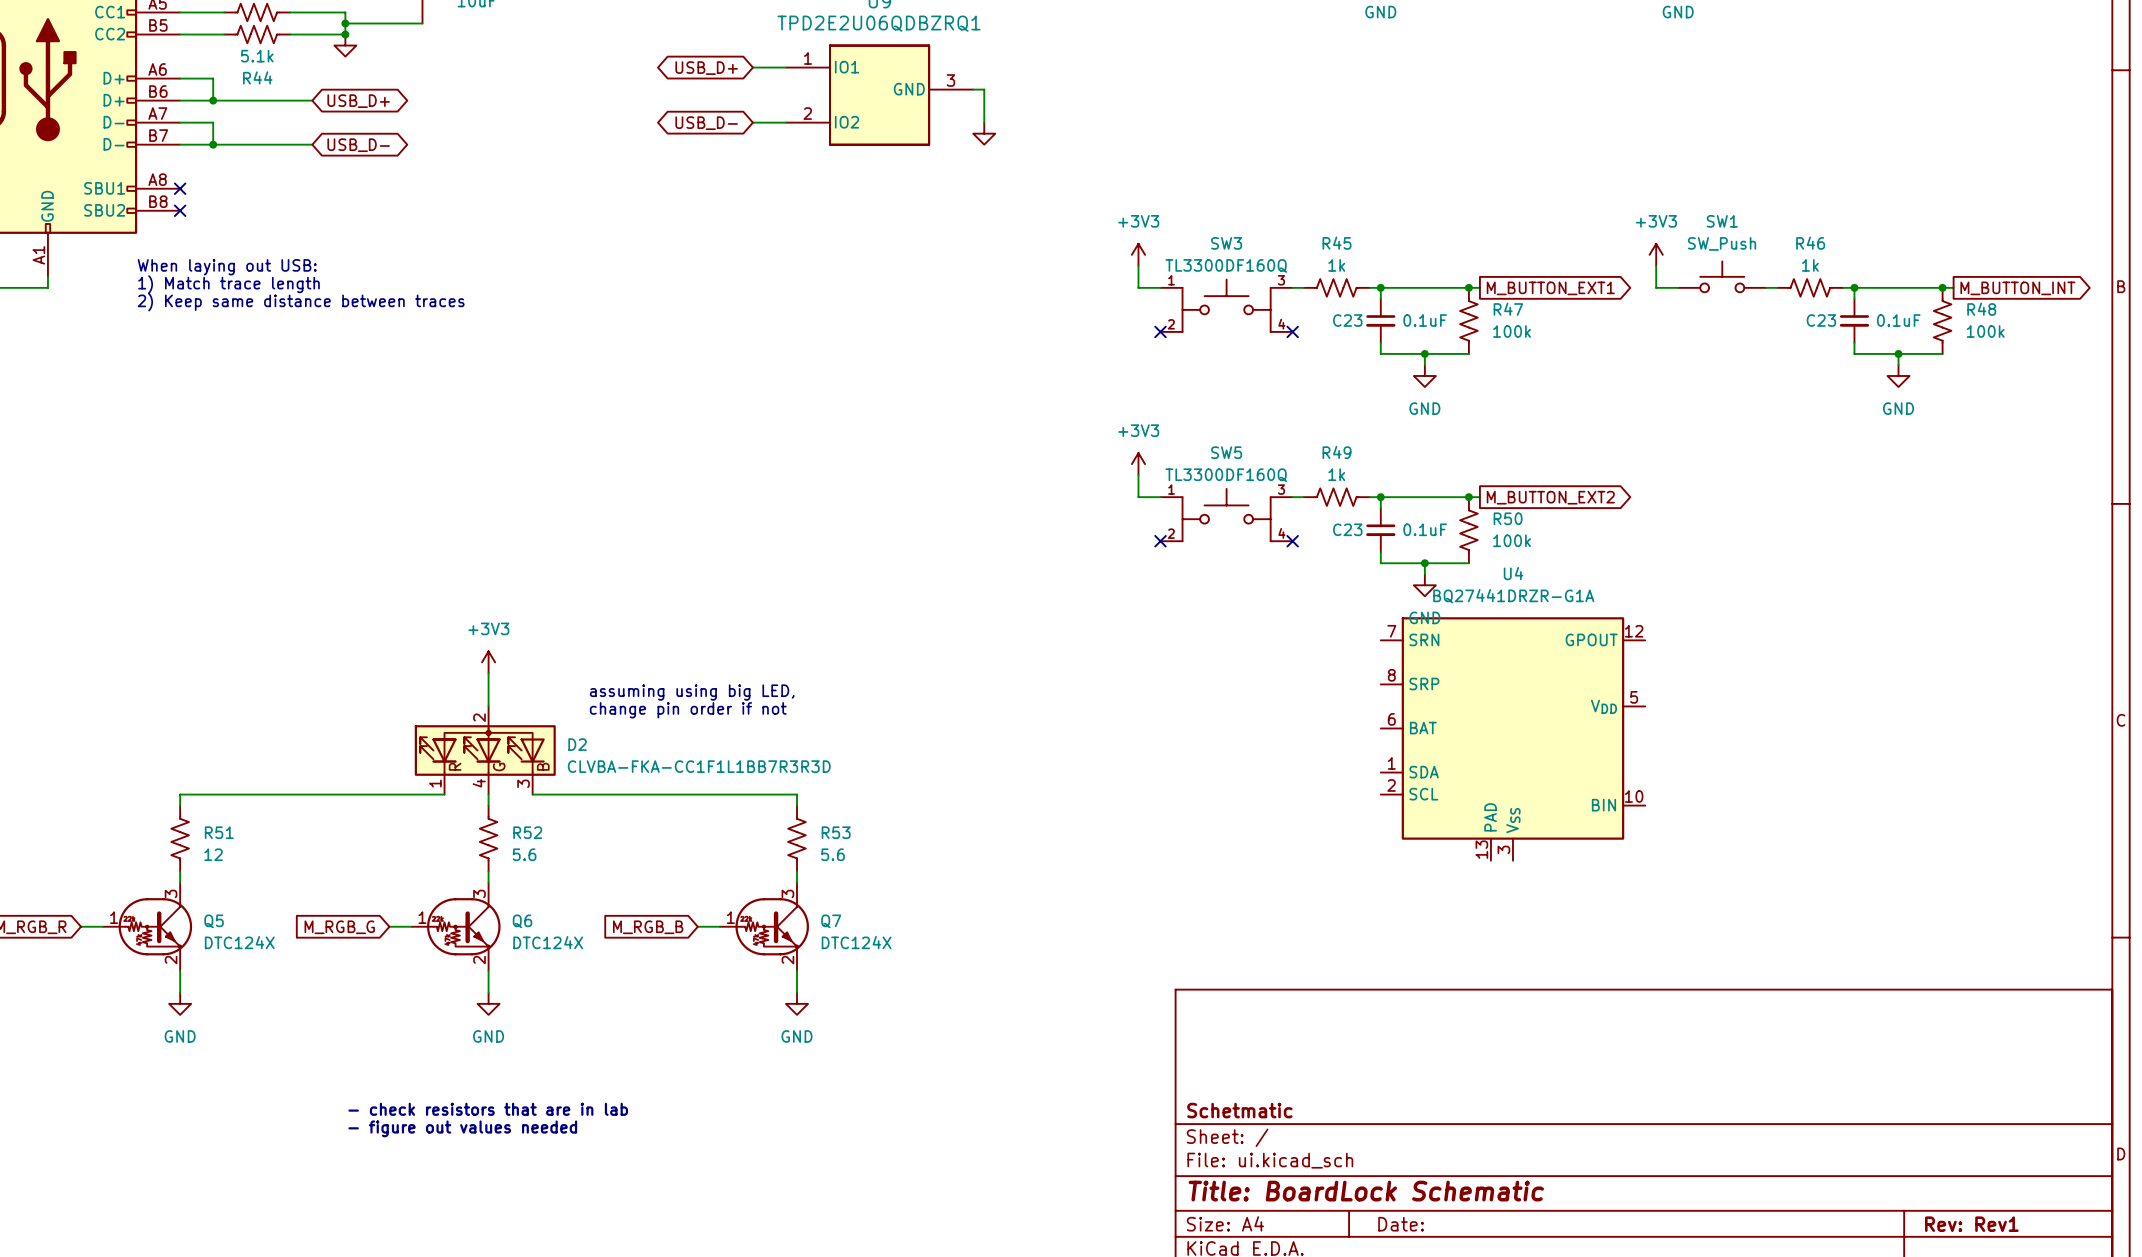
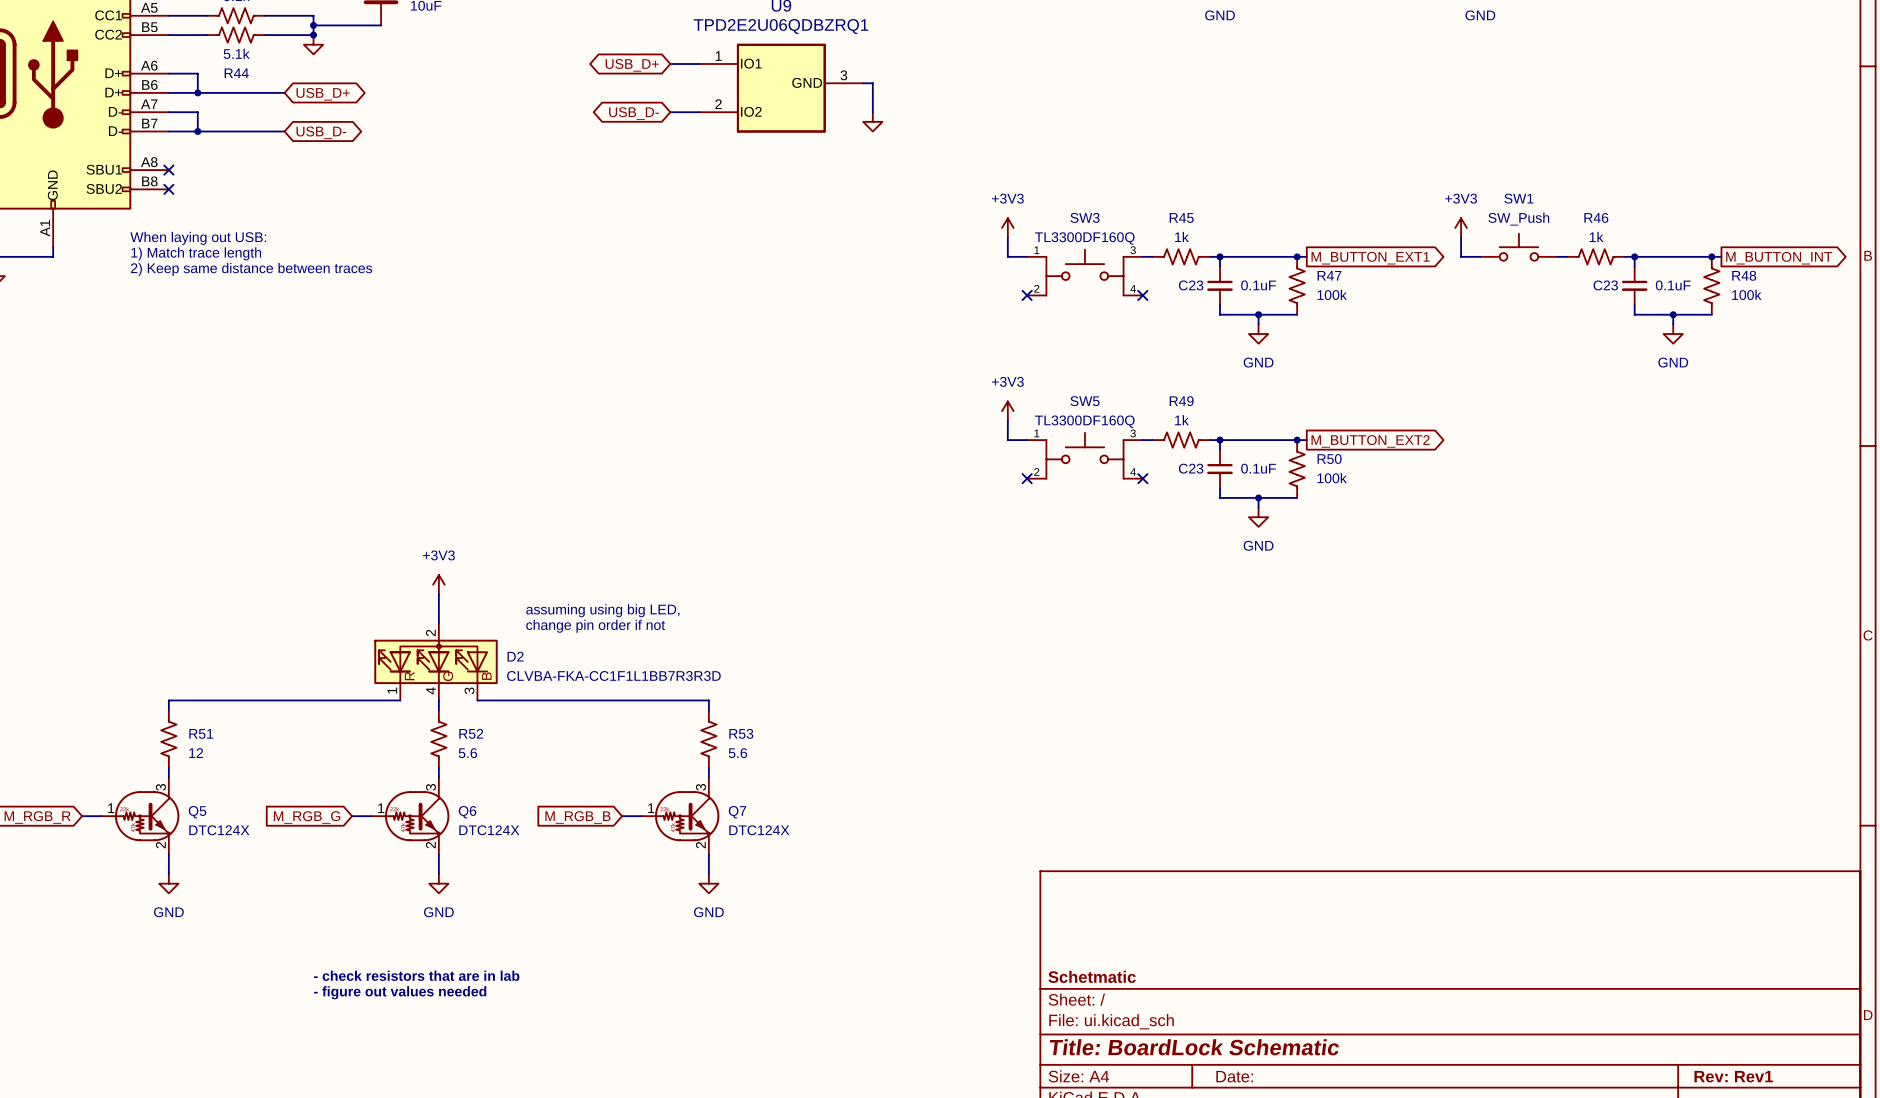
U4: BQ27441DRZR-G1A (1512, 738) -> none

